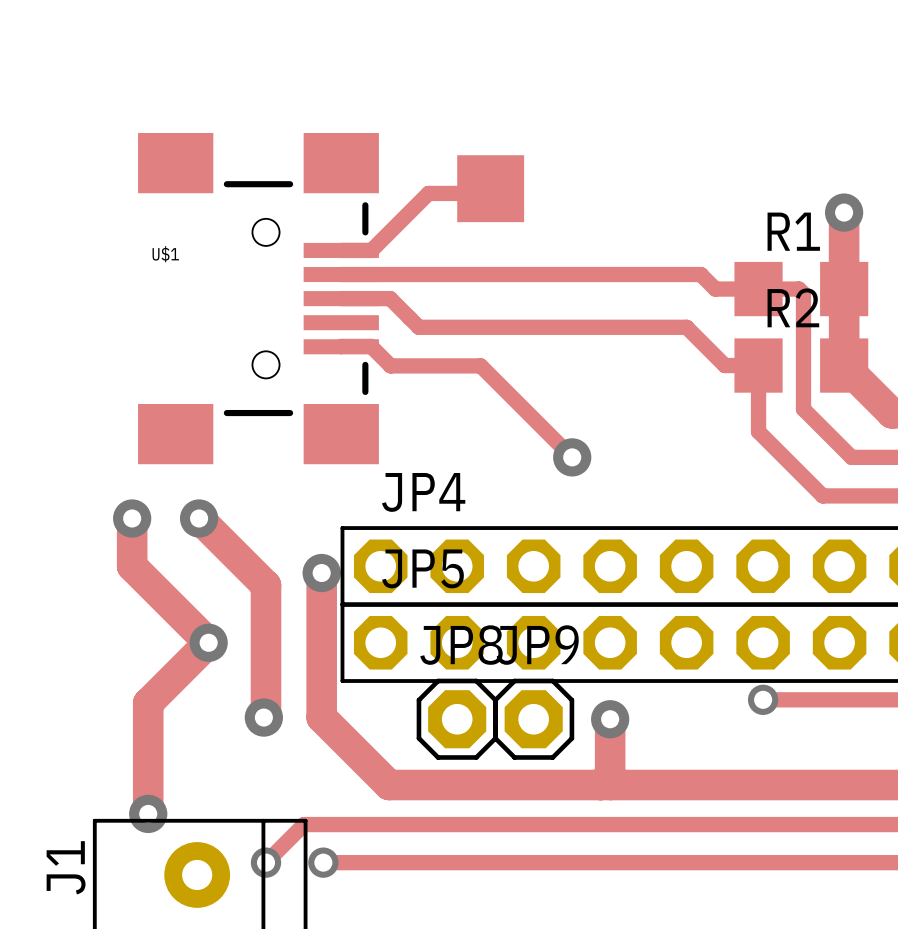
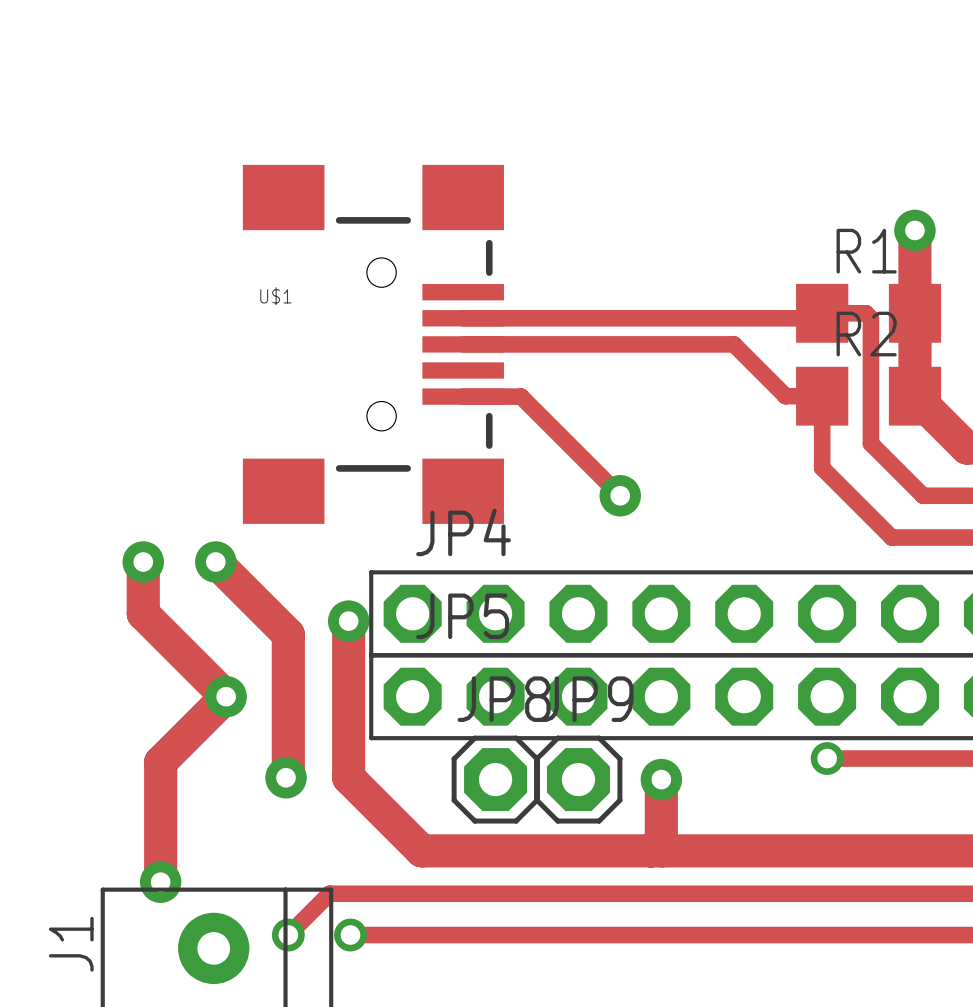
drawing: [457, 155, 525, 223] -> none
track: (485, 193) (495, 193) (428, 193) (371, 250) (341, 250) -> none
track: (341, 274) (700, 274) (715, 289) (758, 289) -> none
track: none -> (463, 318) (817, 318)
U$1 position: (258, 298) -> (373, 344)
track: (341, 298) (390, 298) (418, 327) (686, 327) -> (463, 344) (733, 344) (744, 354)
track: (341, 346) (371, 346) (390, 365) (427, 365) -> none

